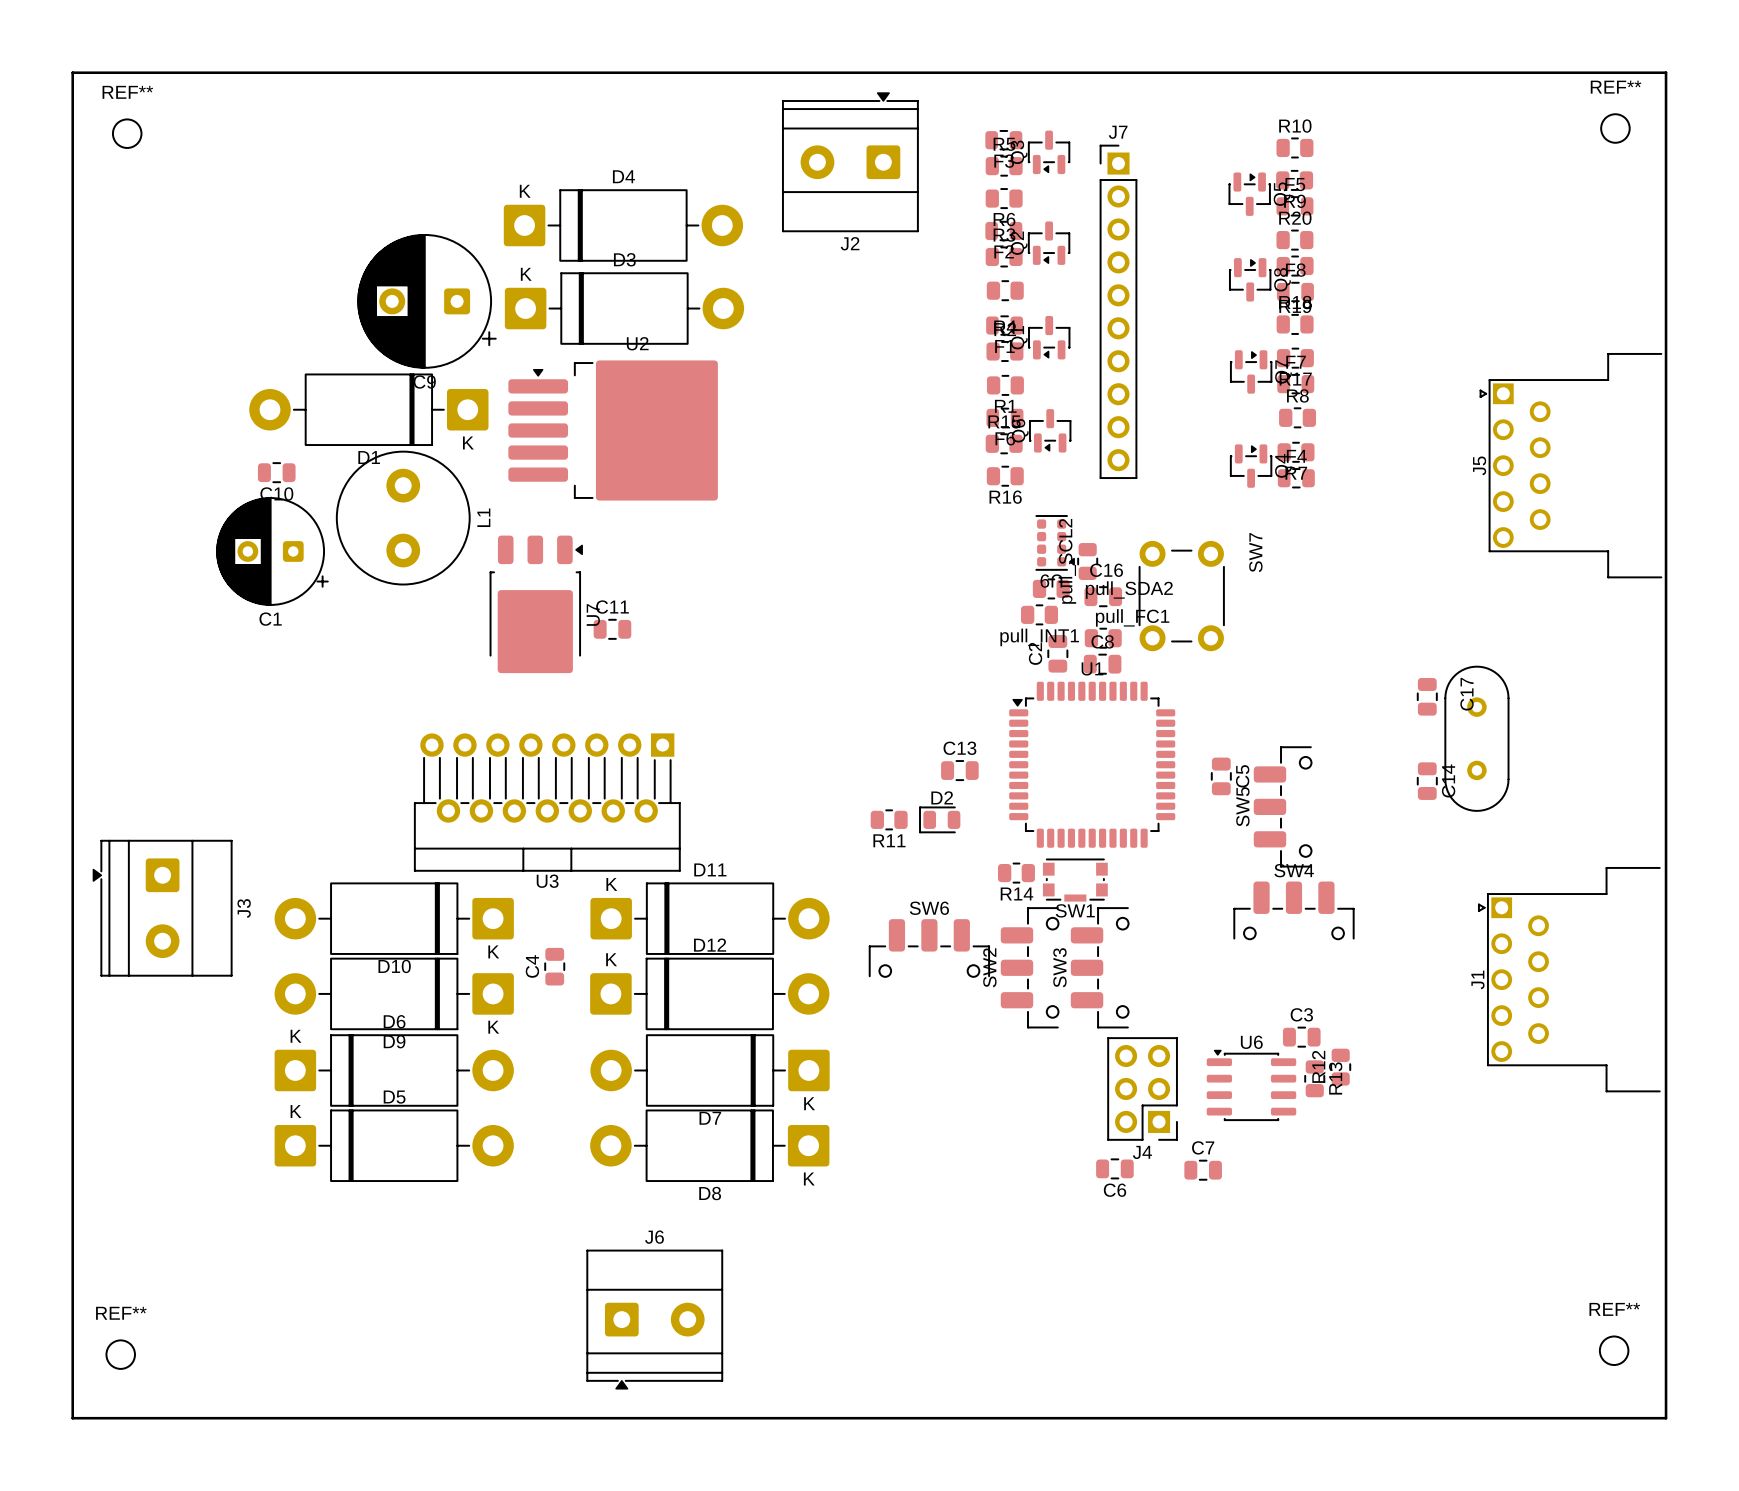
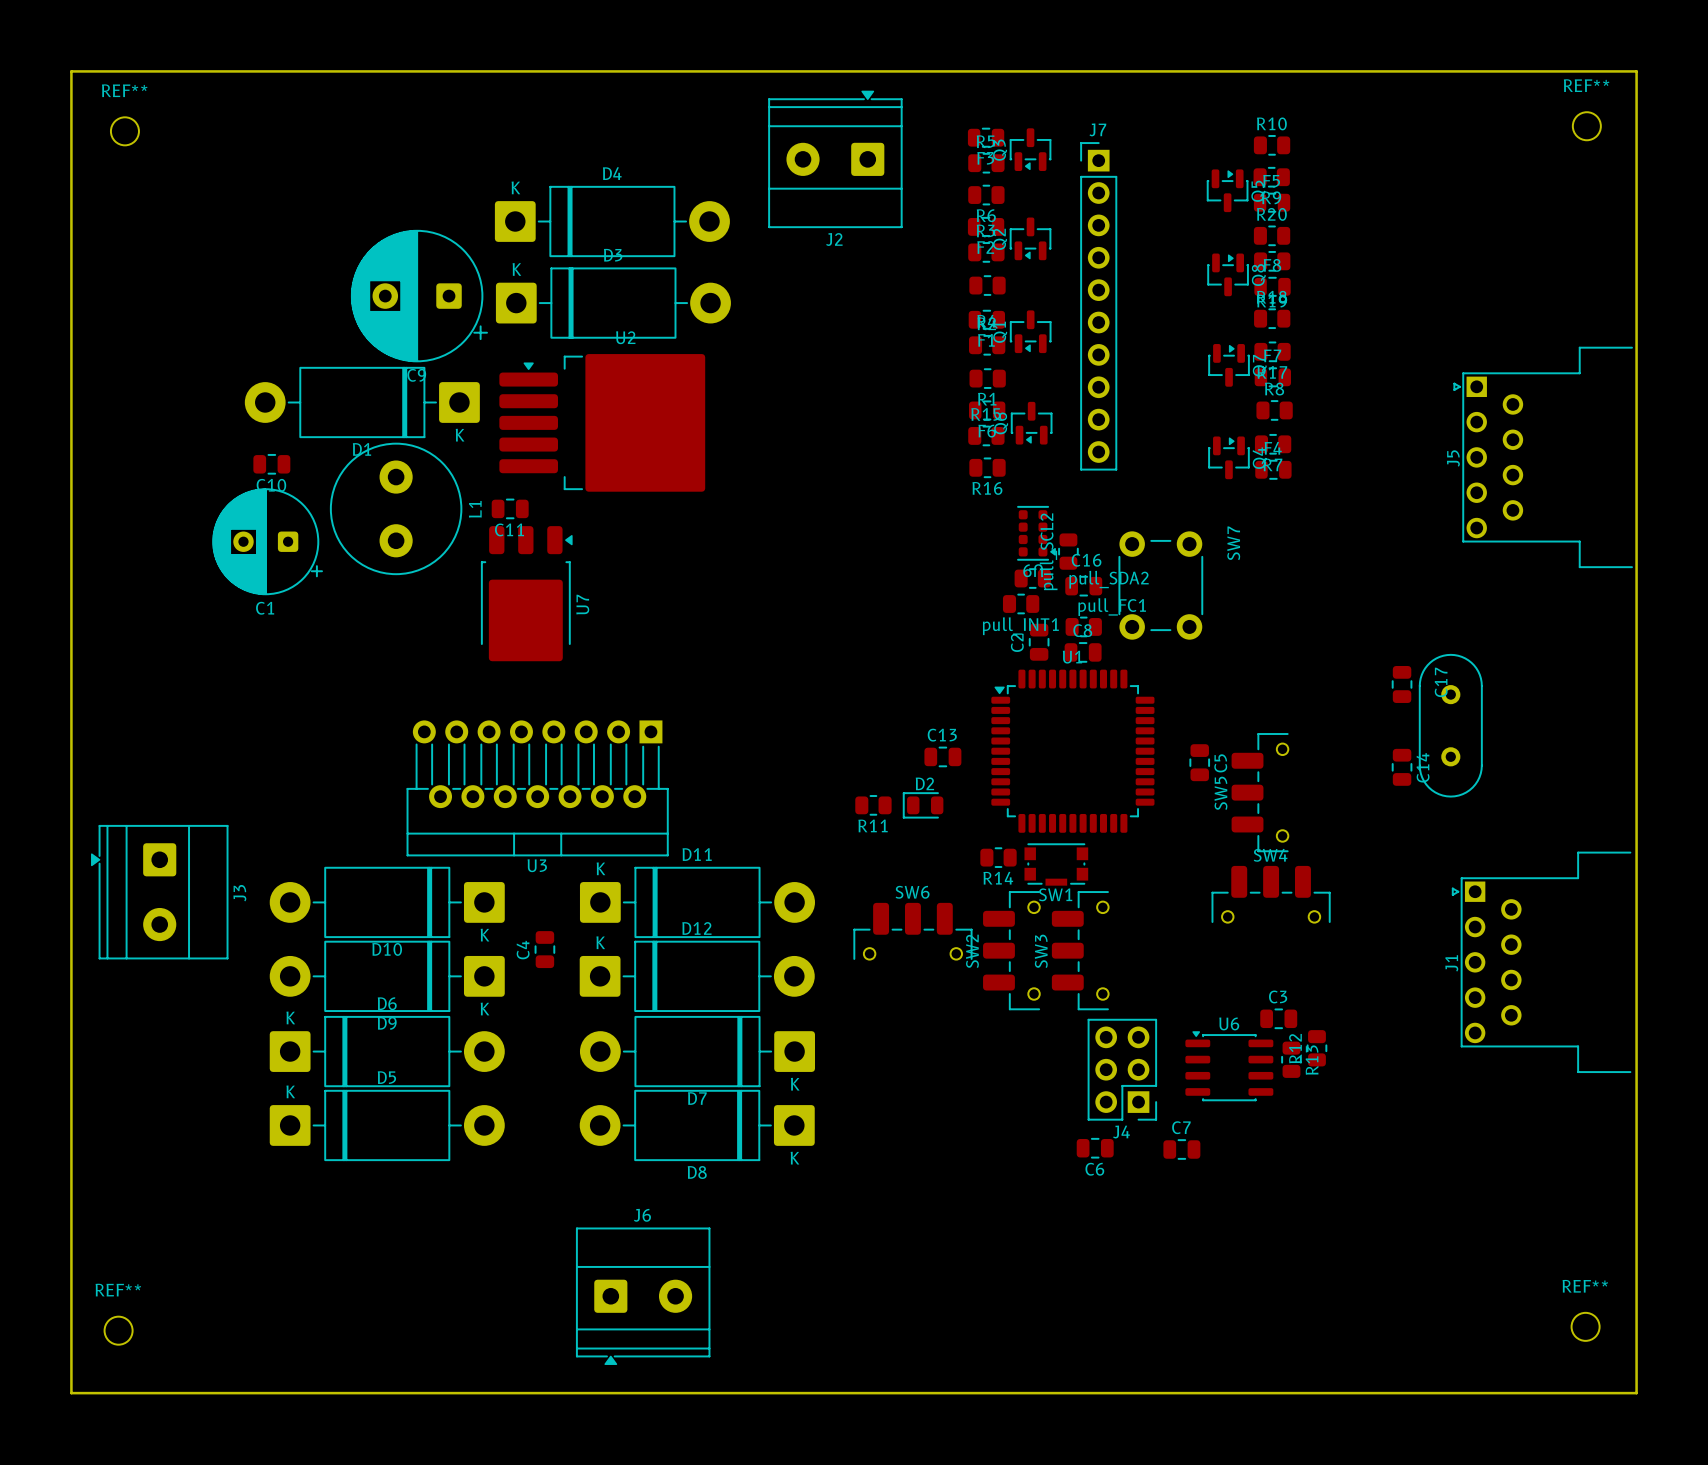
C11 name position: C11 (612, 607) -> C11 (509, 529)
C11 position: (612, 629) -> (510, 508)

